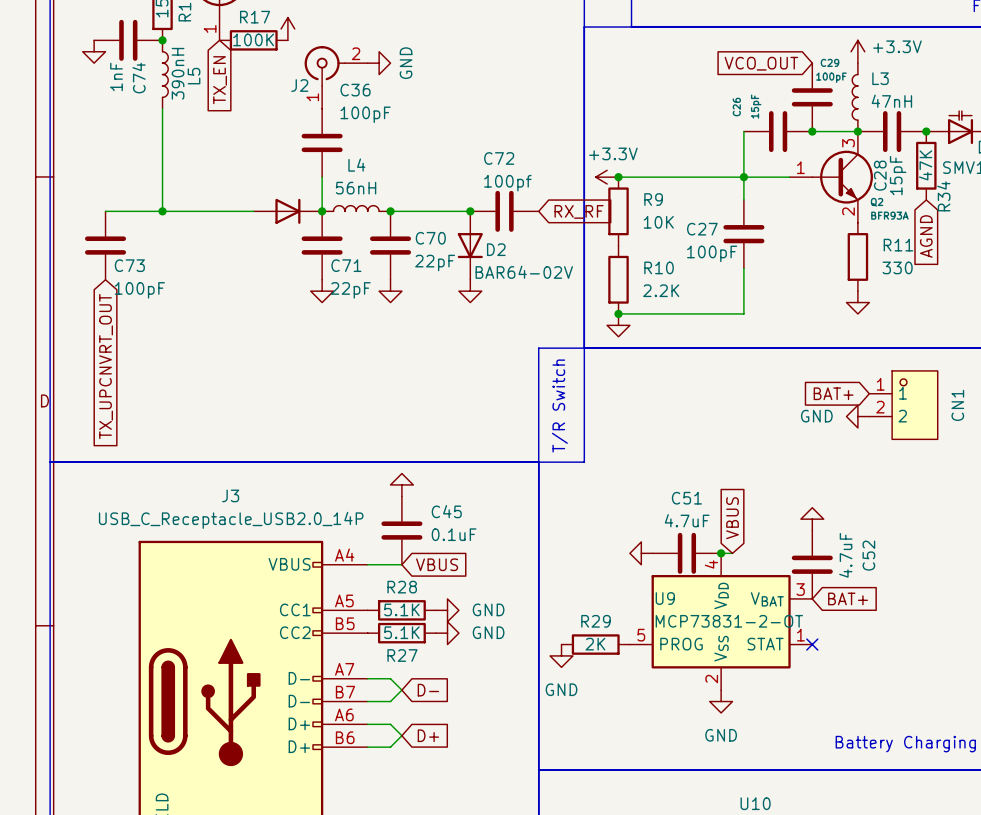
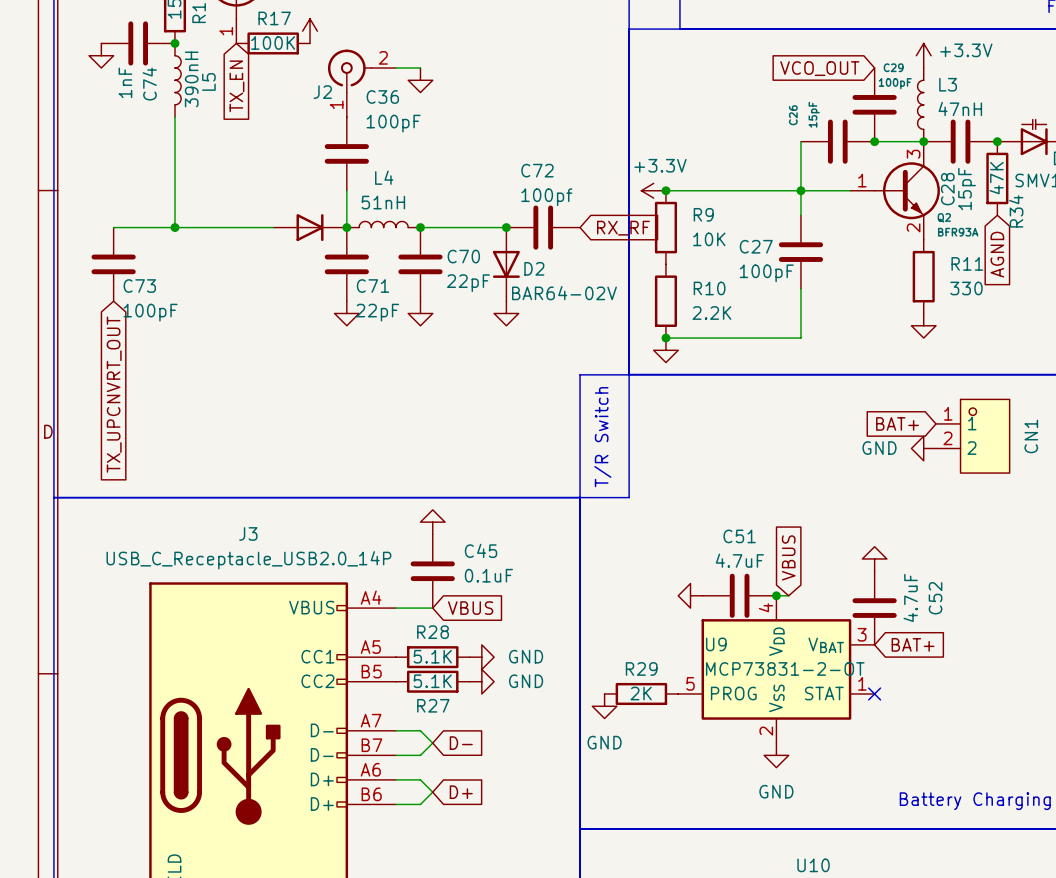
power symbol: GND (379, 63) -> none
power symbol: none -> (420, 80)
L4 value: 56nH (356, 188) -> 51nH (383, 202)

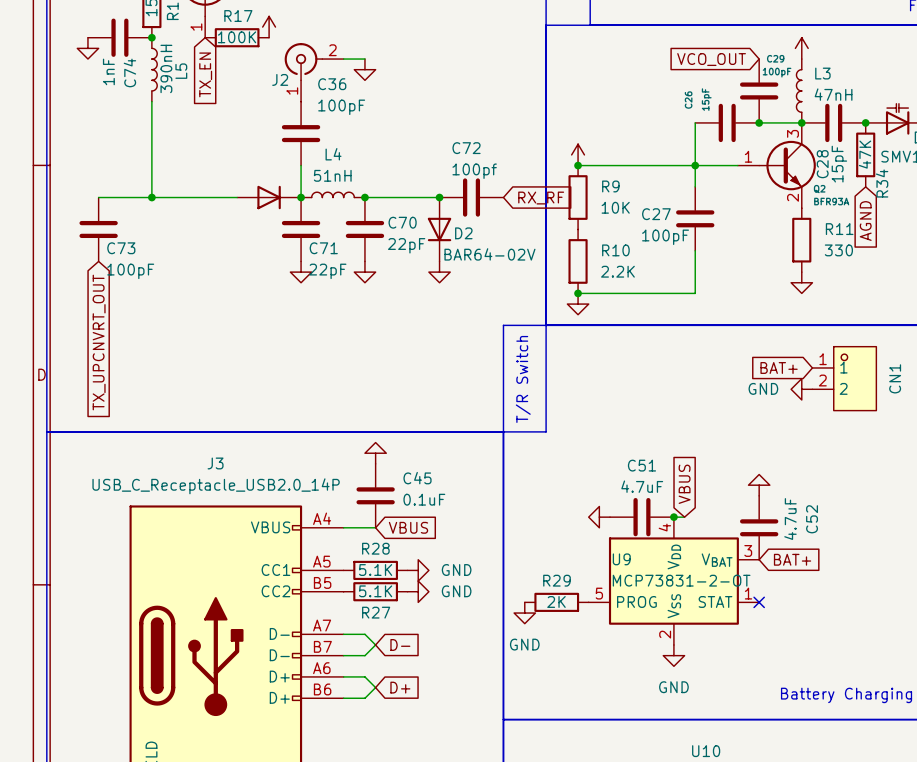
power symbol text: +3.3V (966, 50) -> none
power symbol: none -> (578, 154)
power symbol: +3.3V (653, 190) -> none

